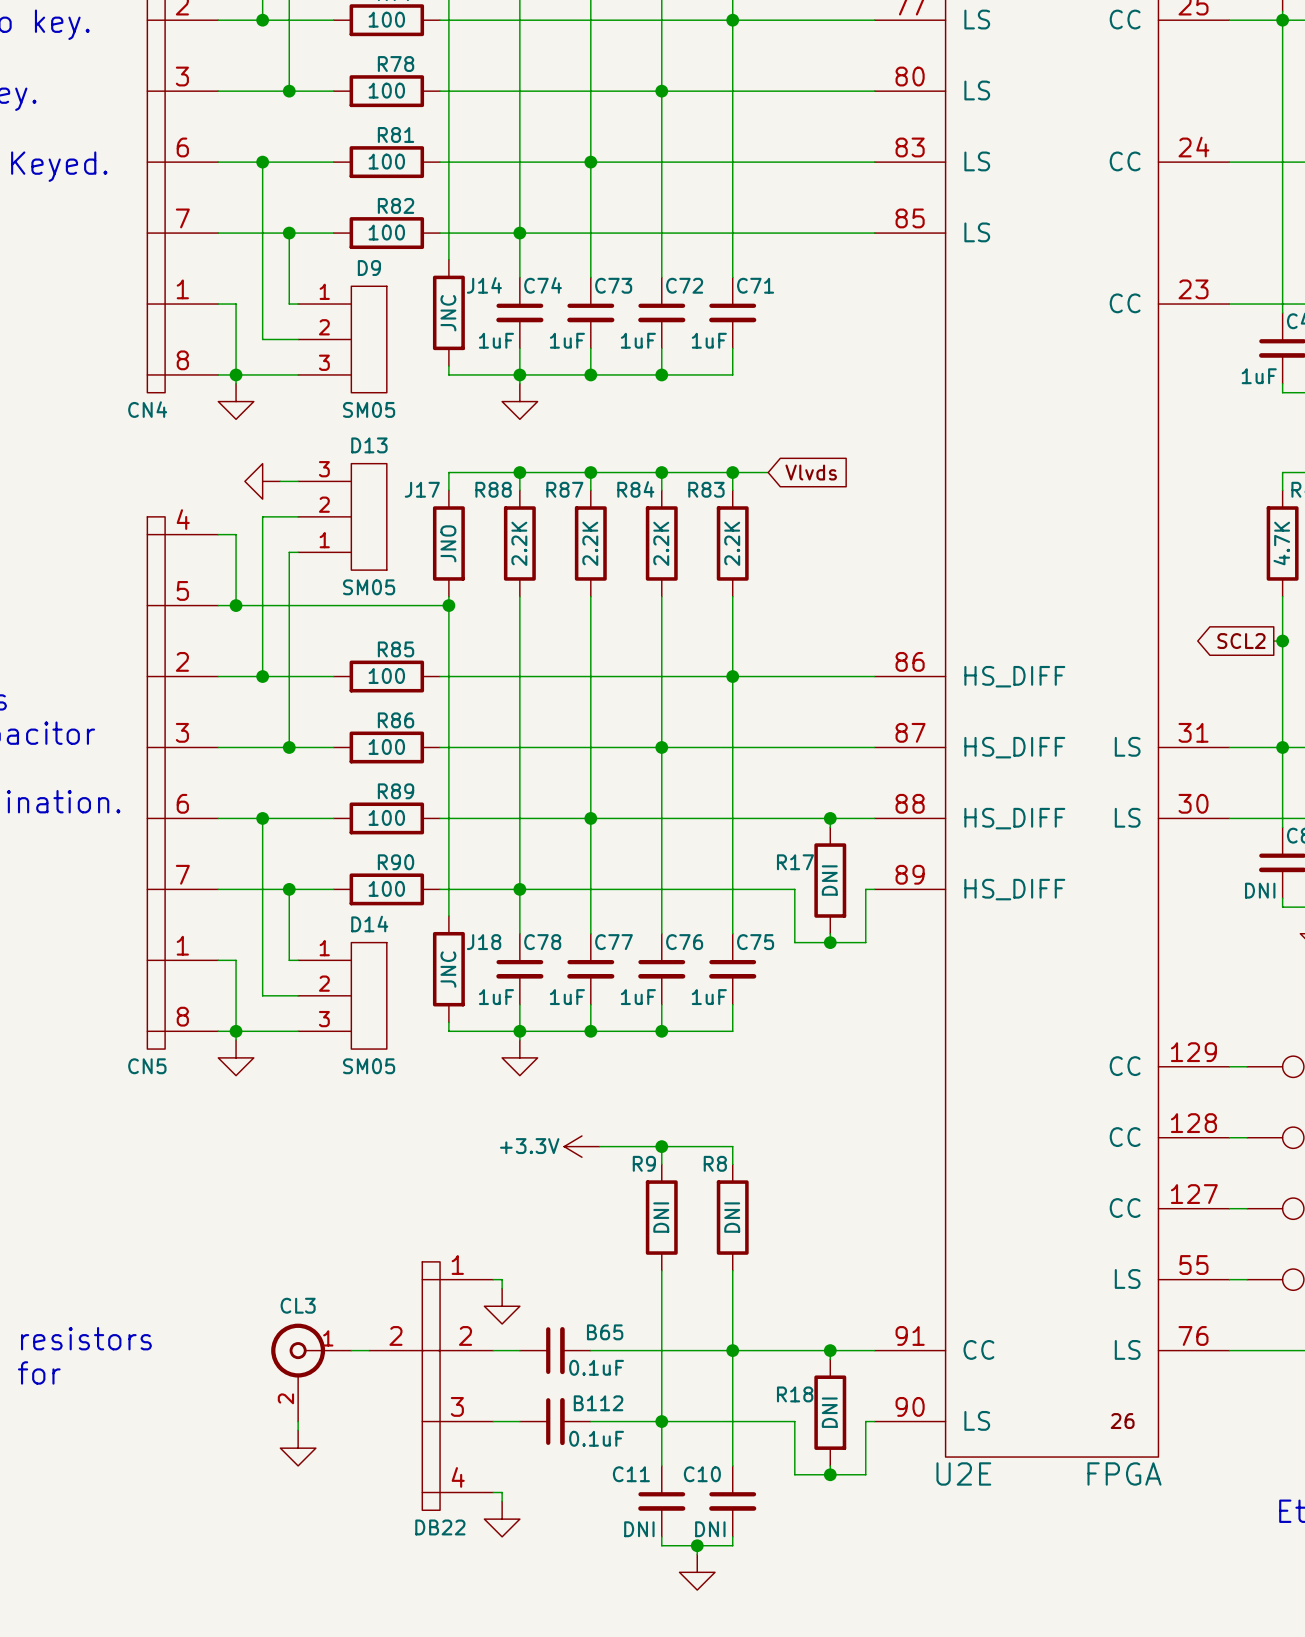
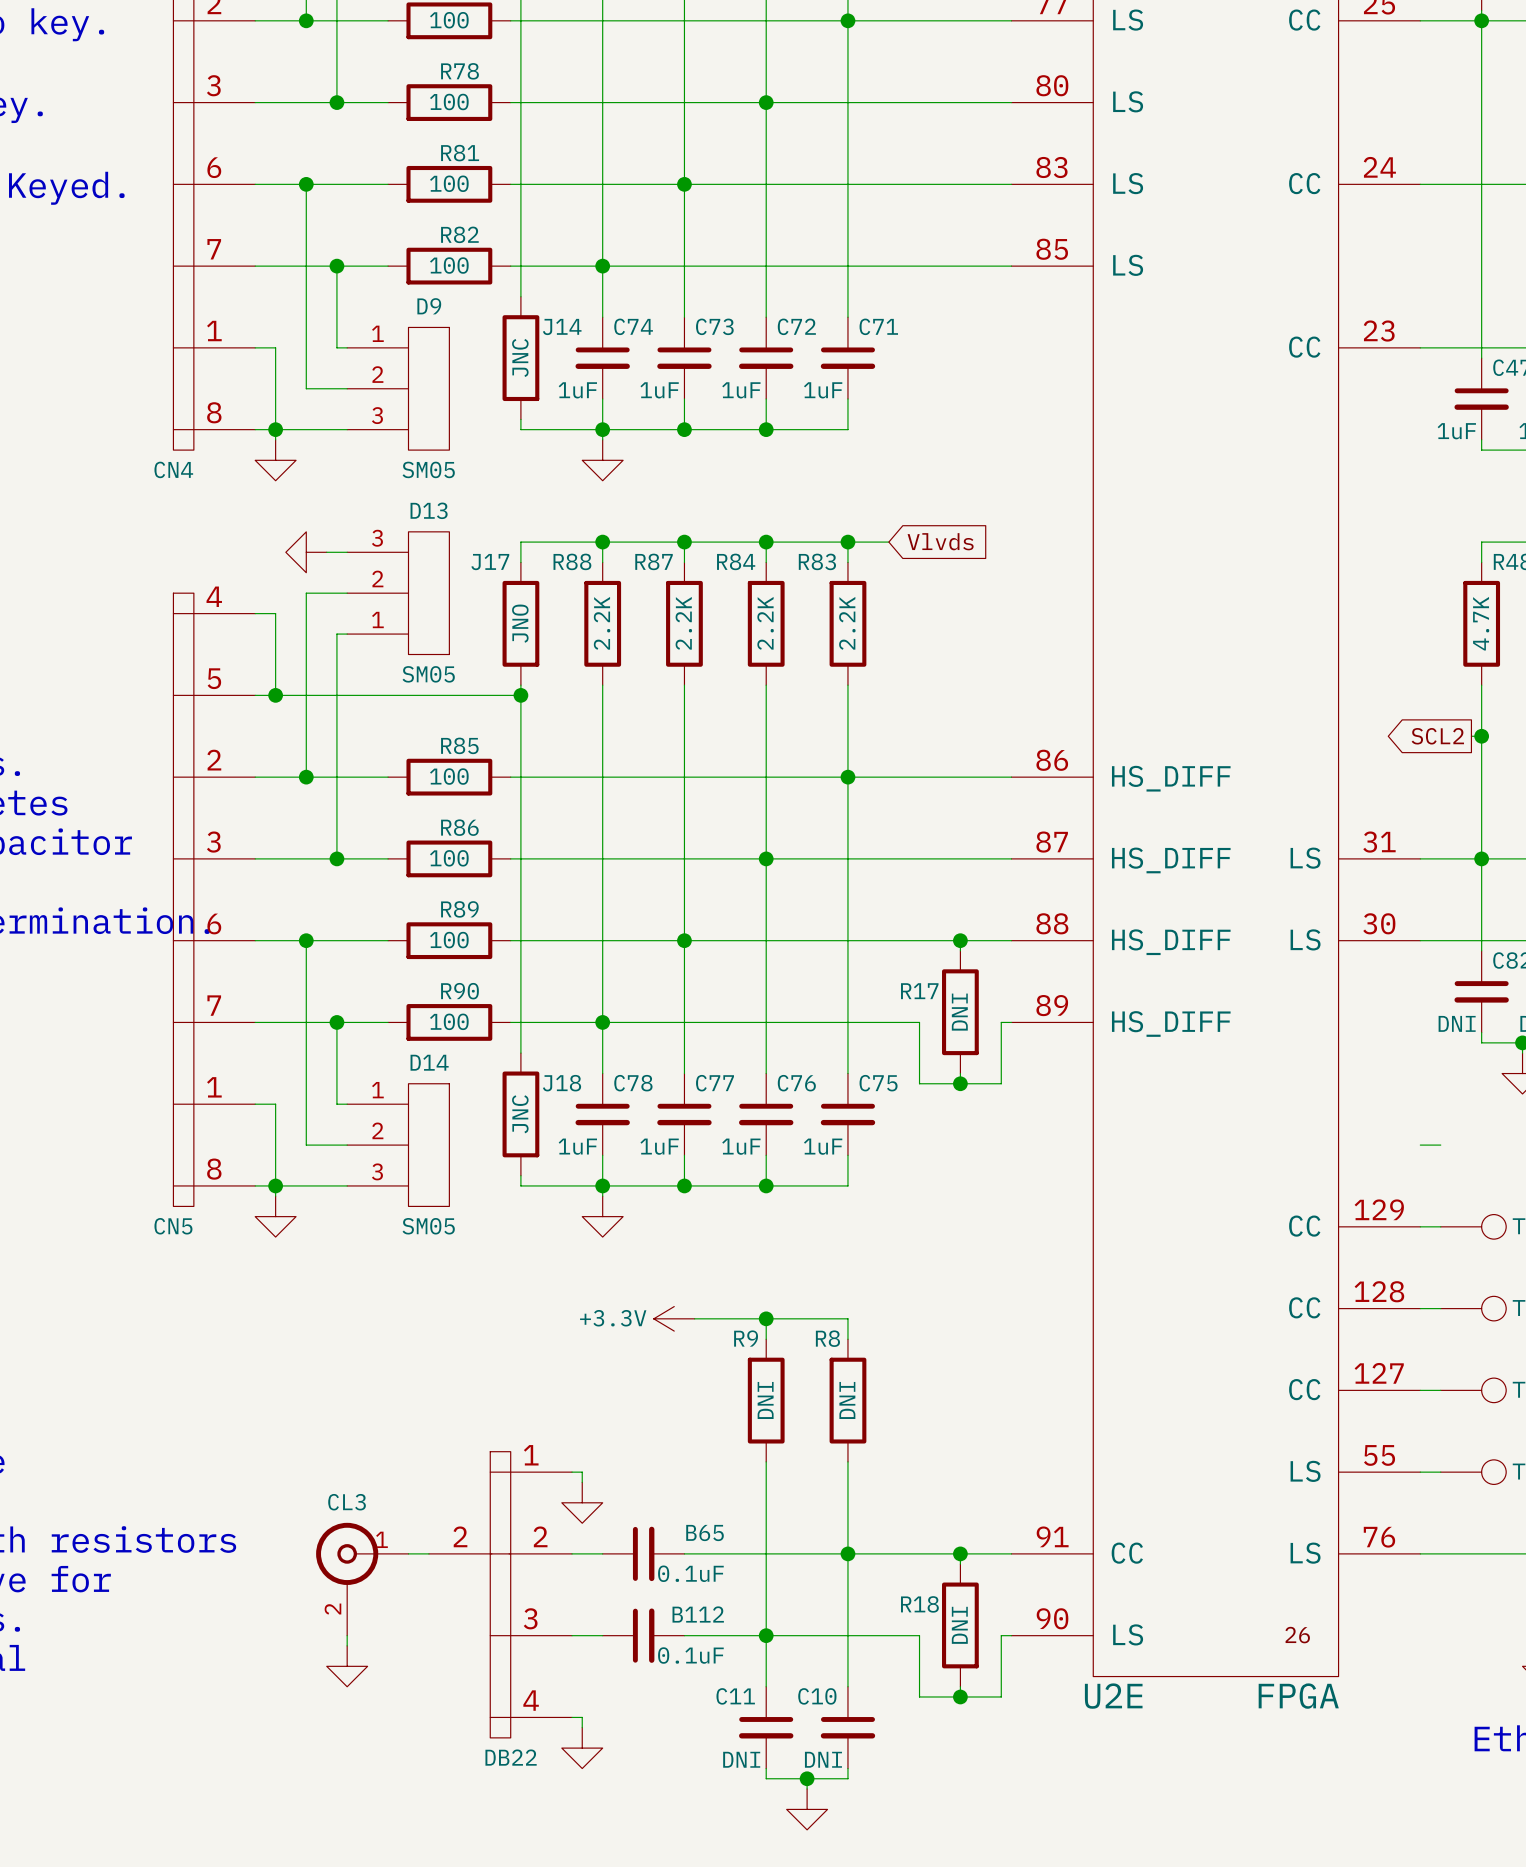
wire: none -> (1420, 1145) (1440, 1145)

